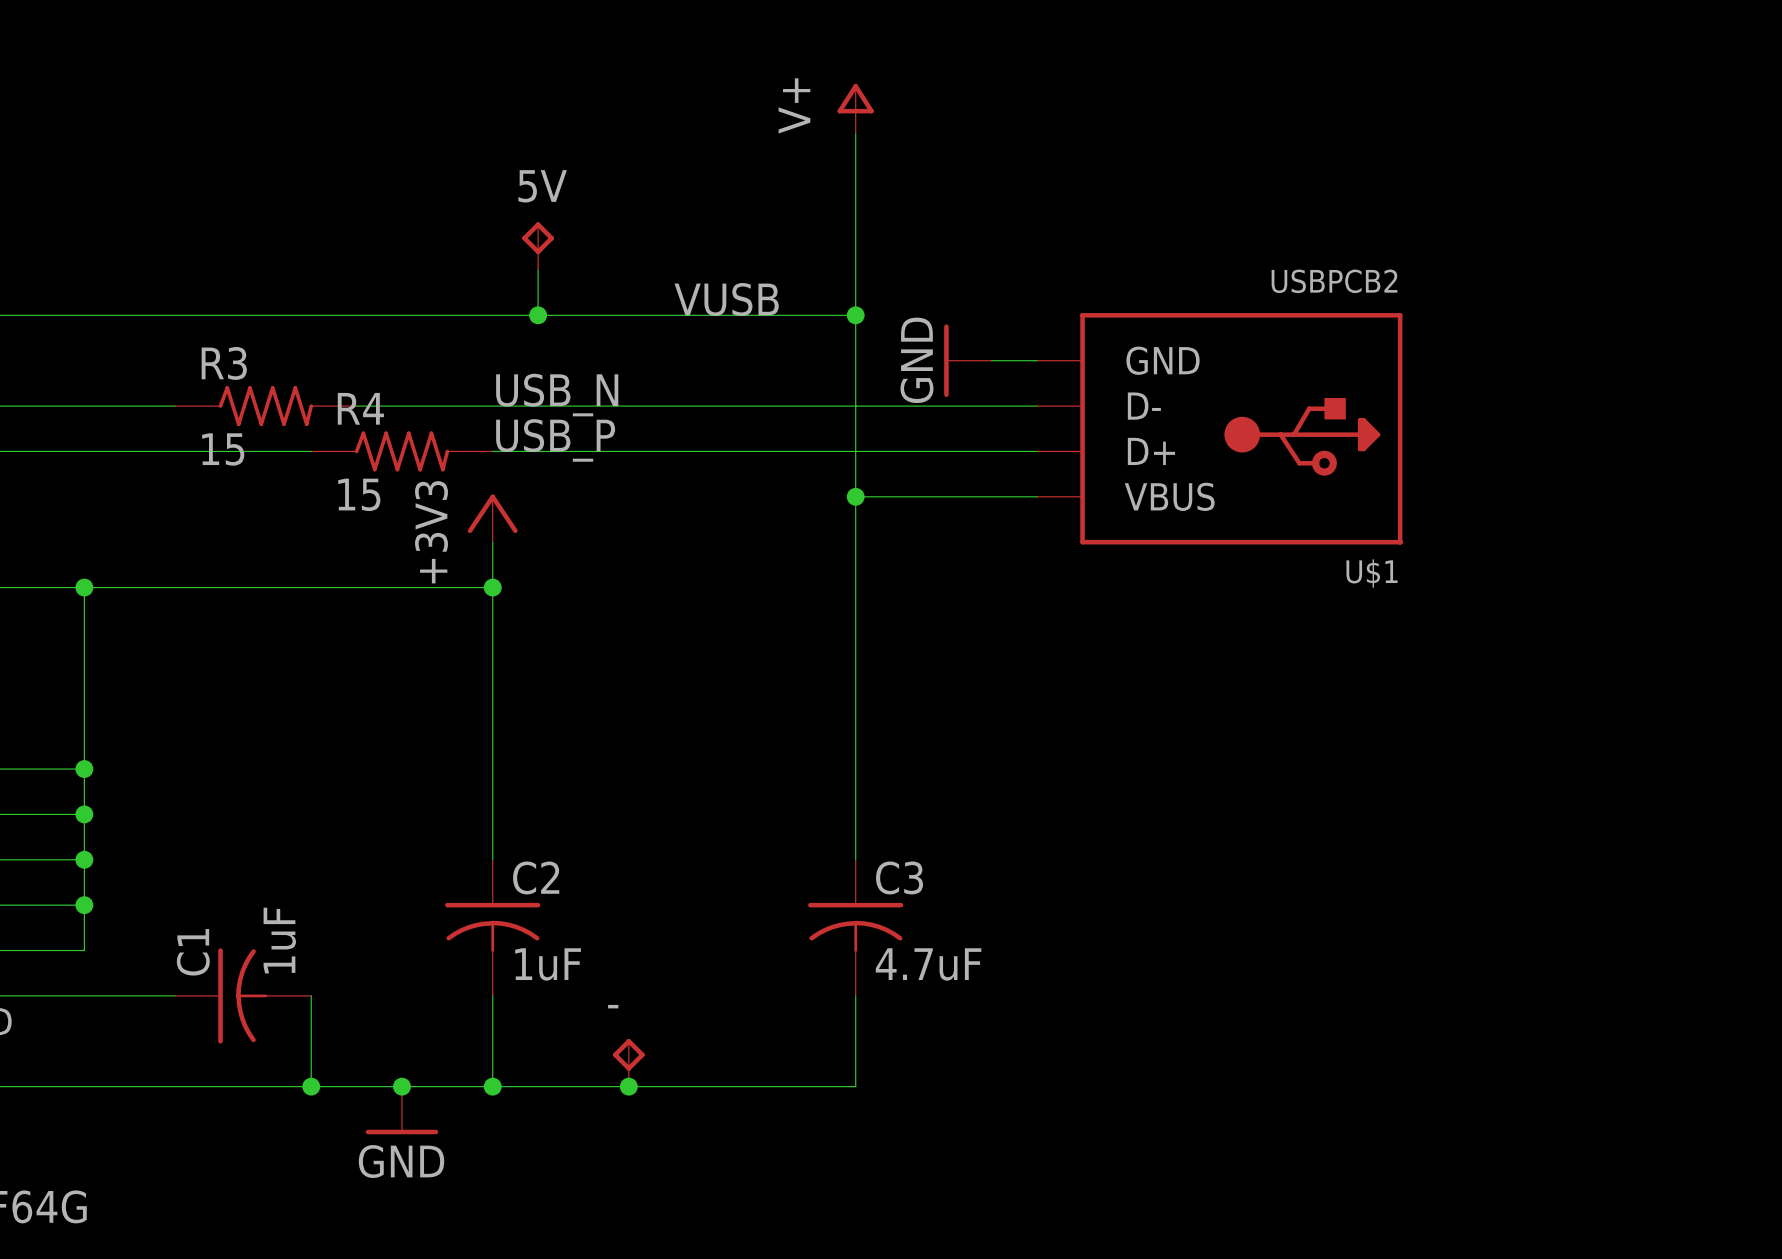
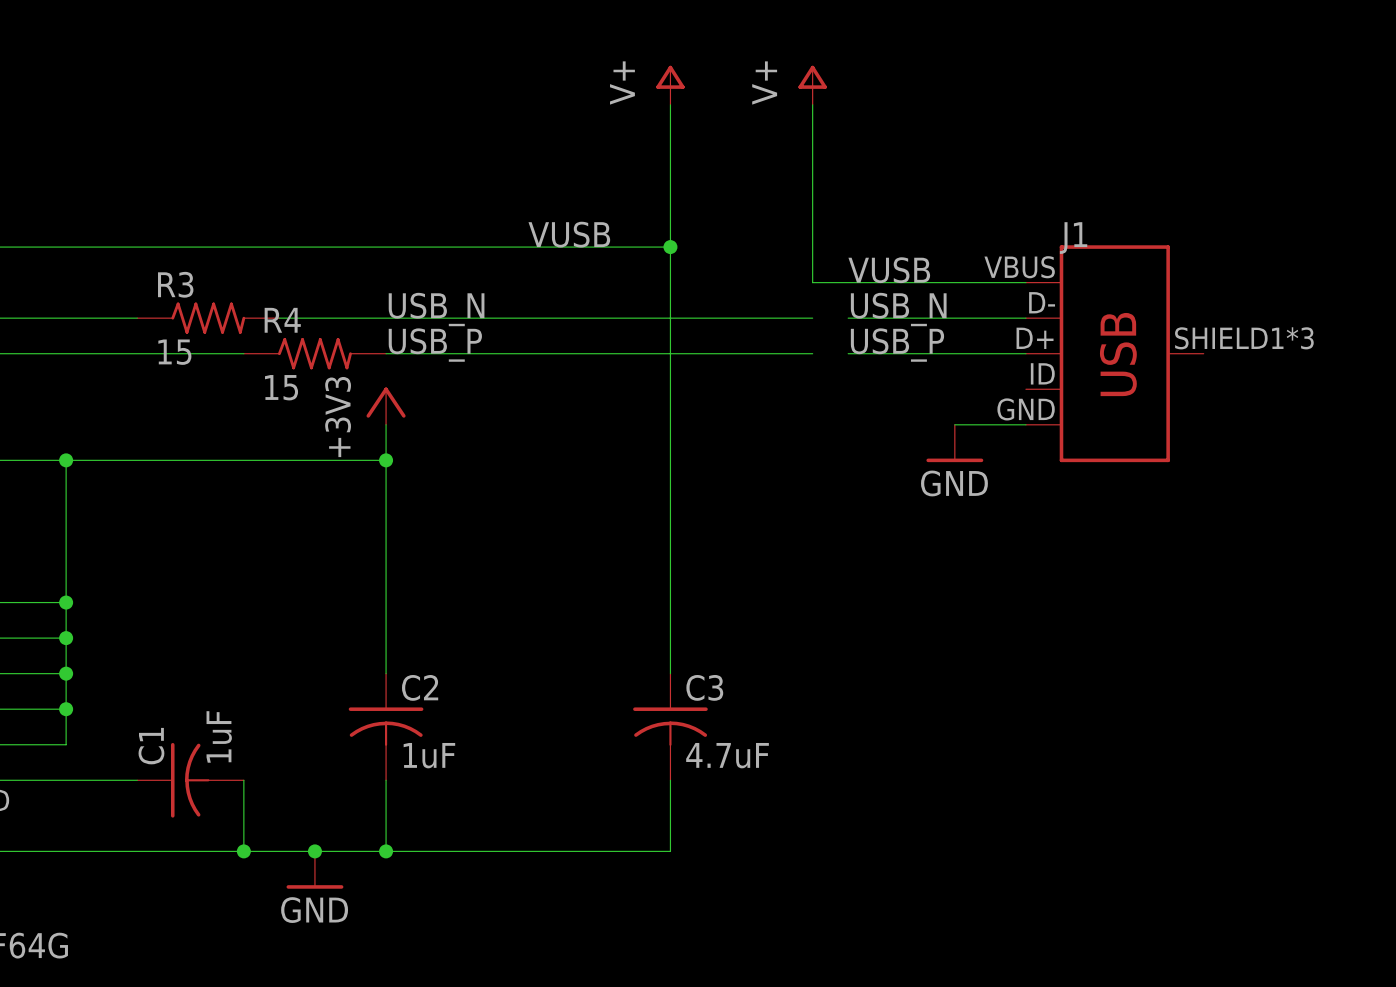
power symbol: none -> V+ (812, 85)
wire: none -> (812, 104) (812, 282) (1025, 282)
5V: (538, 246) -> none
wire: (538, 269) (538, 315) -> none
junction: (538, 315) -> none
label: none -> VUSB (889, 270)
power symbol rotation: 0° (946, 360) -> 90° counterclockwise (954, 460)
power symbol position: GND (967, 360) -> GND (954, 443)
wire: (991, 360) (1037, 360) -> none
label: none -> USB_N (898, 309)
wire: none -> (848, 318) (1025, 318)
U$1: USBPCB2 (1220, 428) -> none
label: none -> USB_P (897, 345)
wire: none -> (848, 353) (1025, 353)
J1: none -> (1114, 353)
wire: (855, 496) (1037, 496) -> none
junction: (855, 496) -> none
part: (628, 1062) -> none
junction: (628, 1086) -> none

